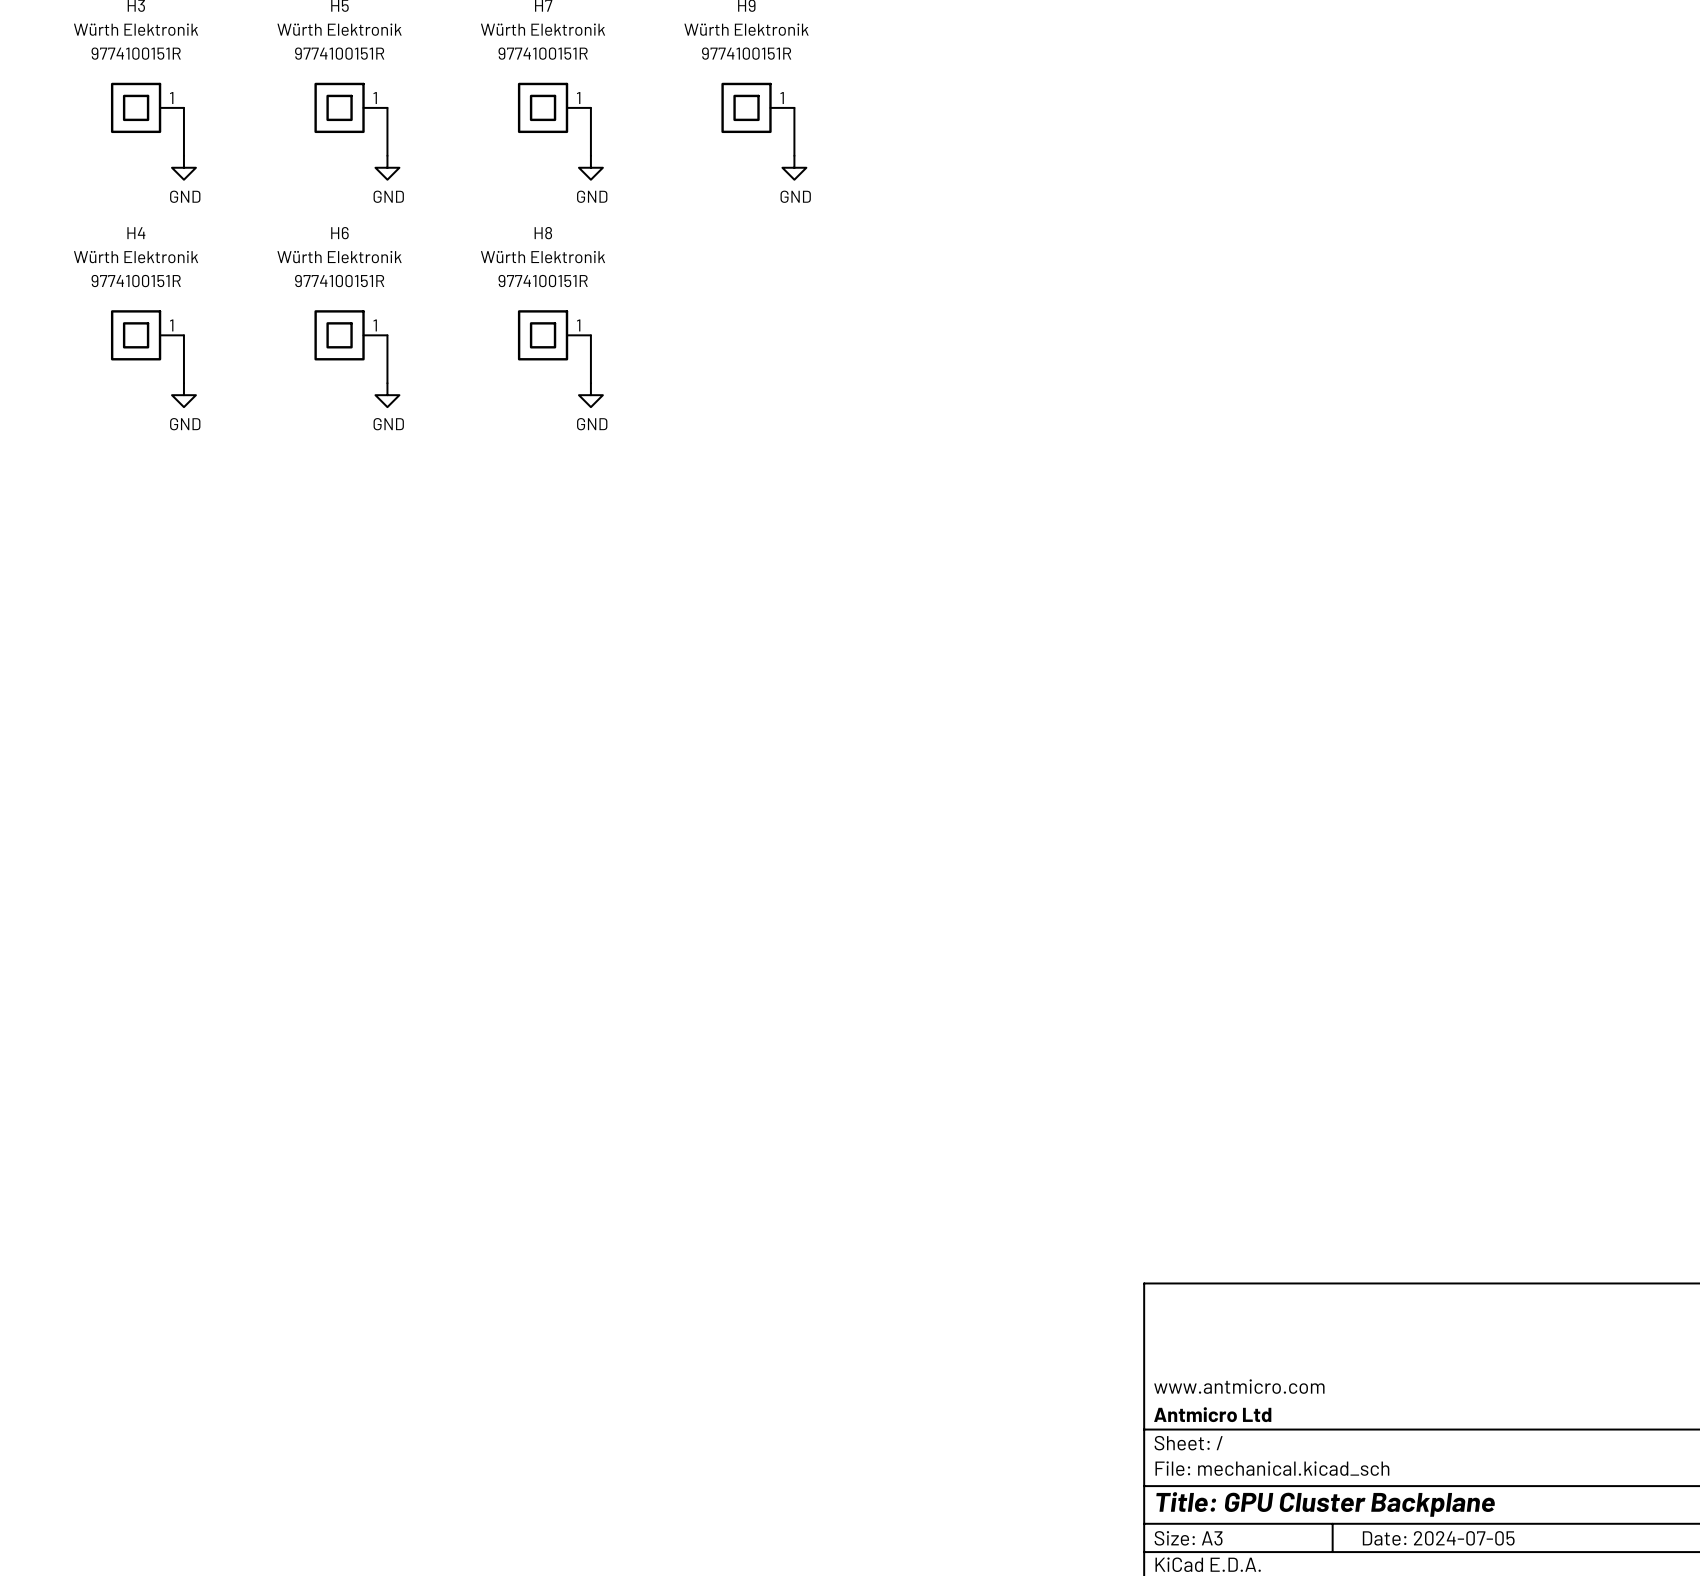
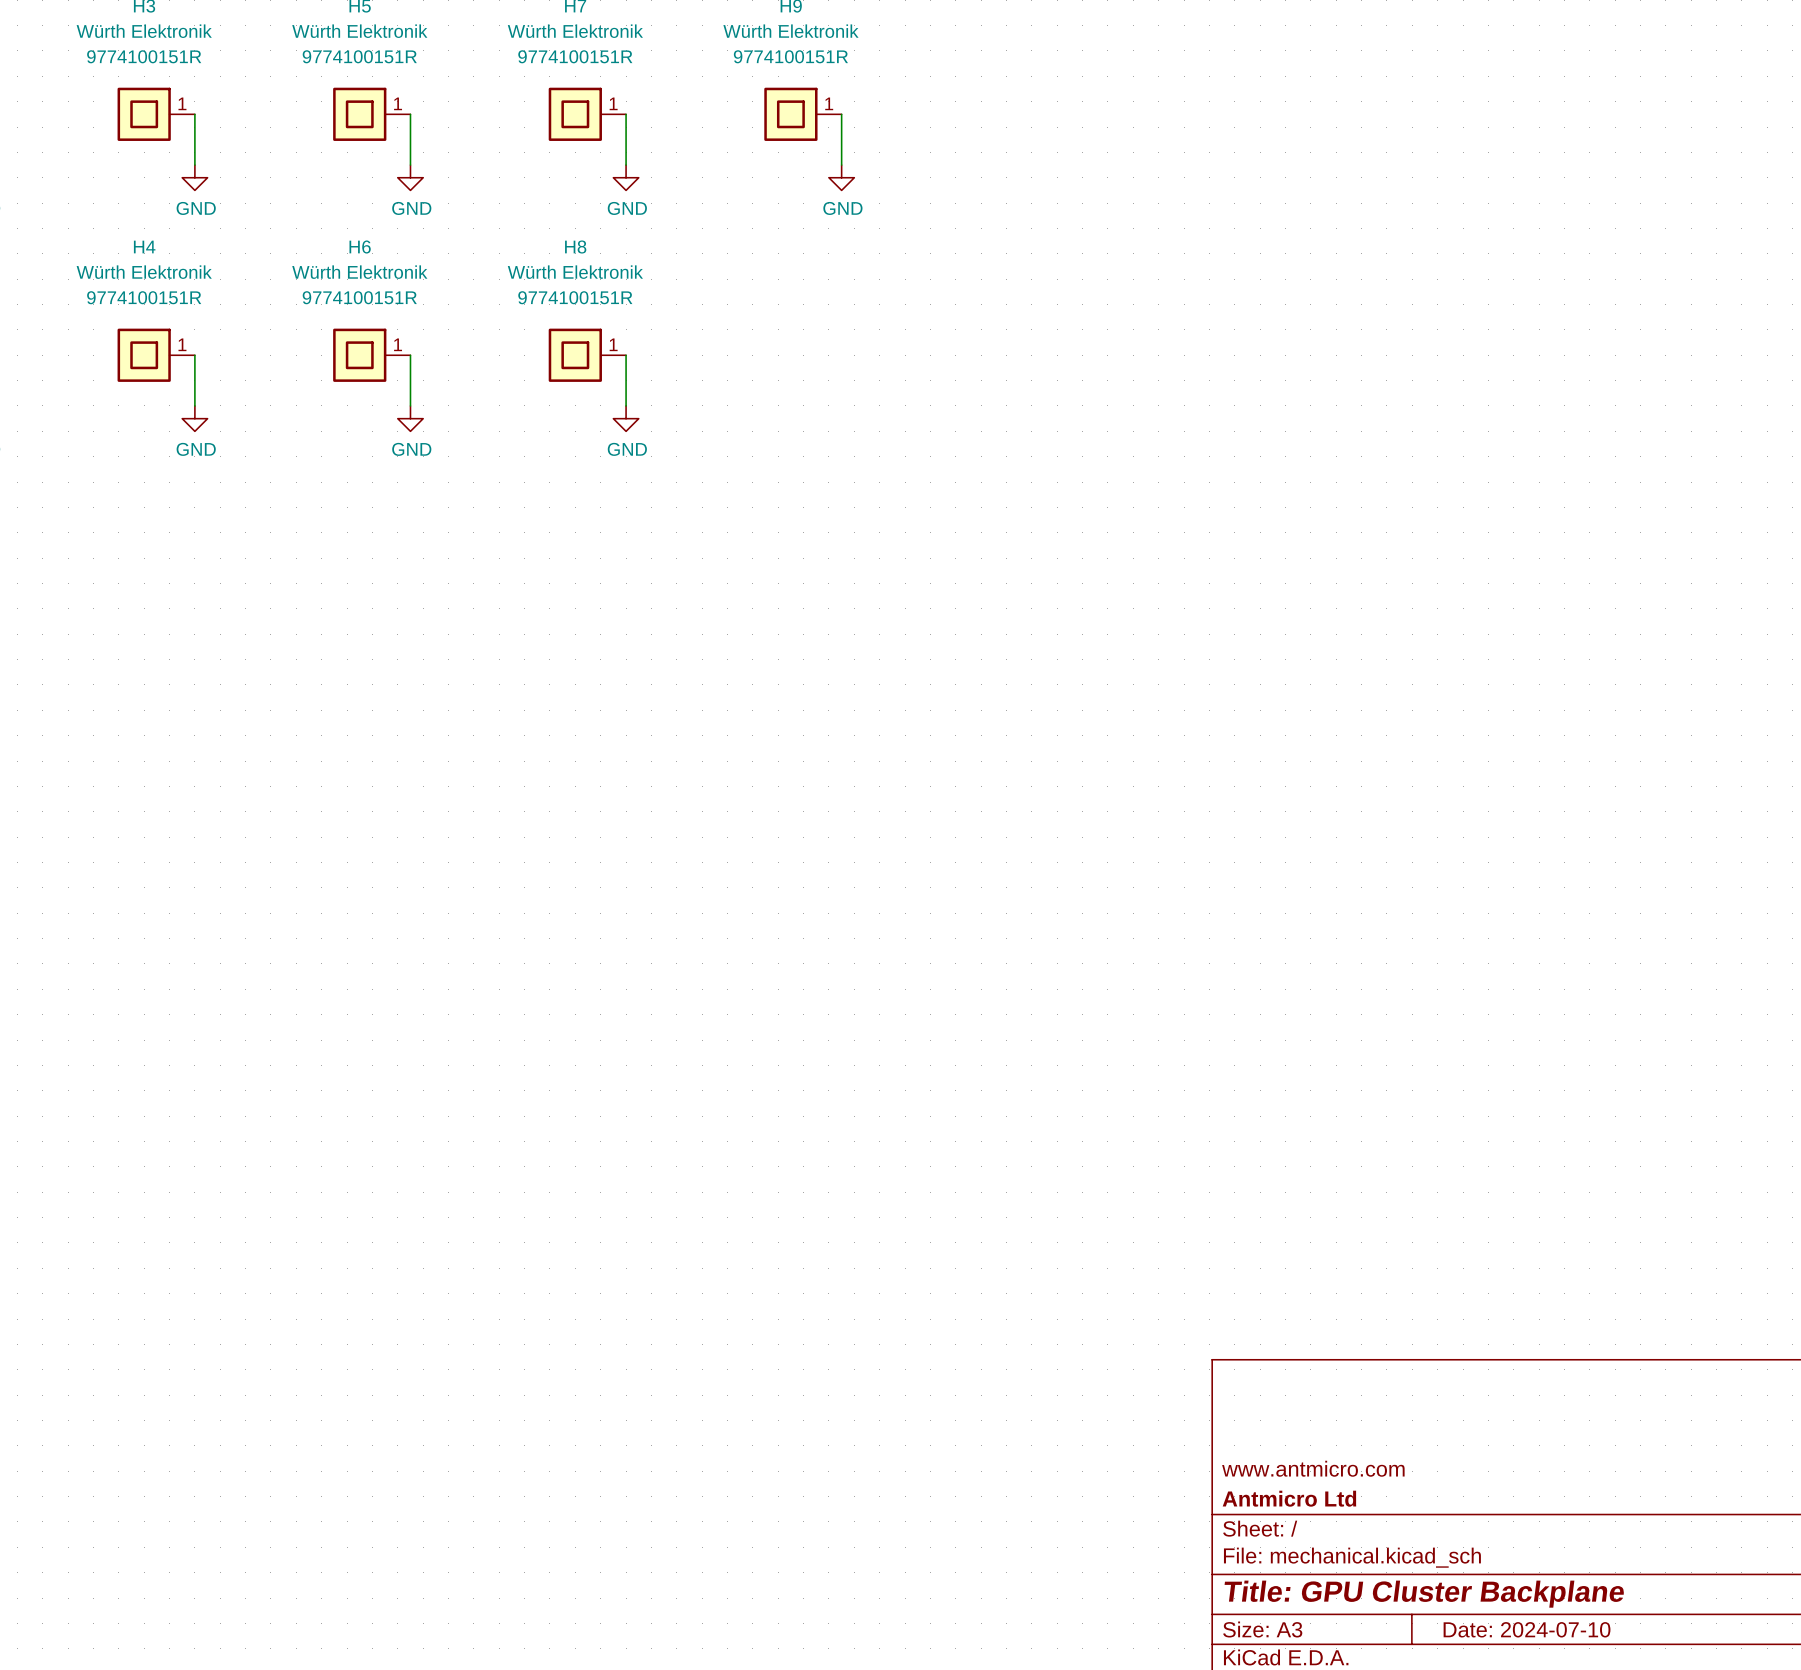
title block: Date: 2024-07-05 (1438, 1538) -> Date: 2024-07-10 (1527, 1629)

